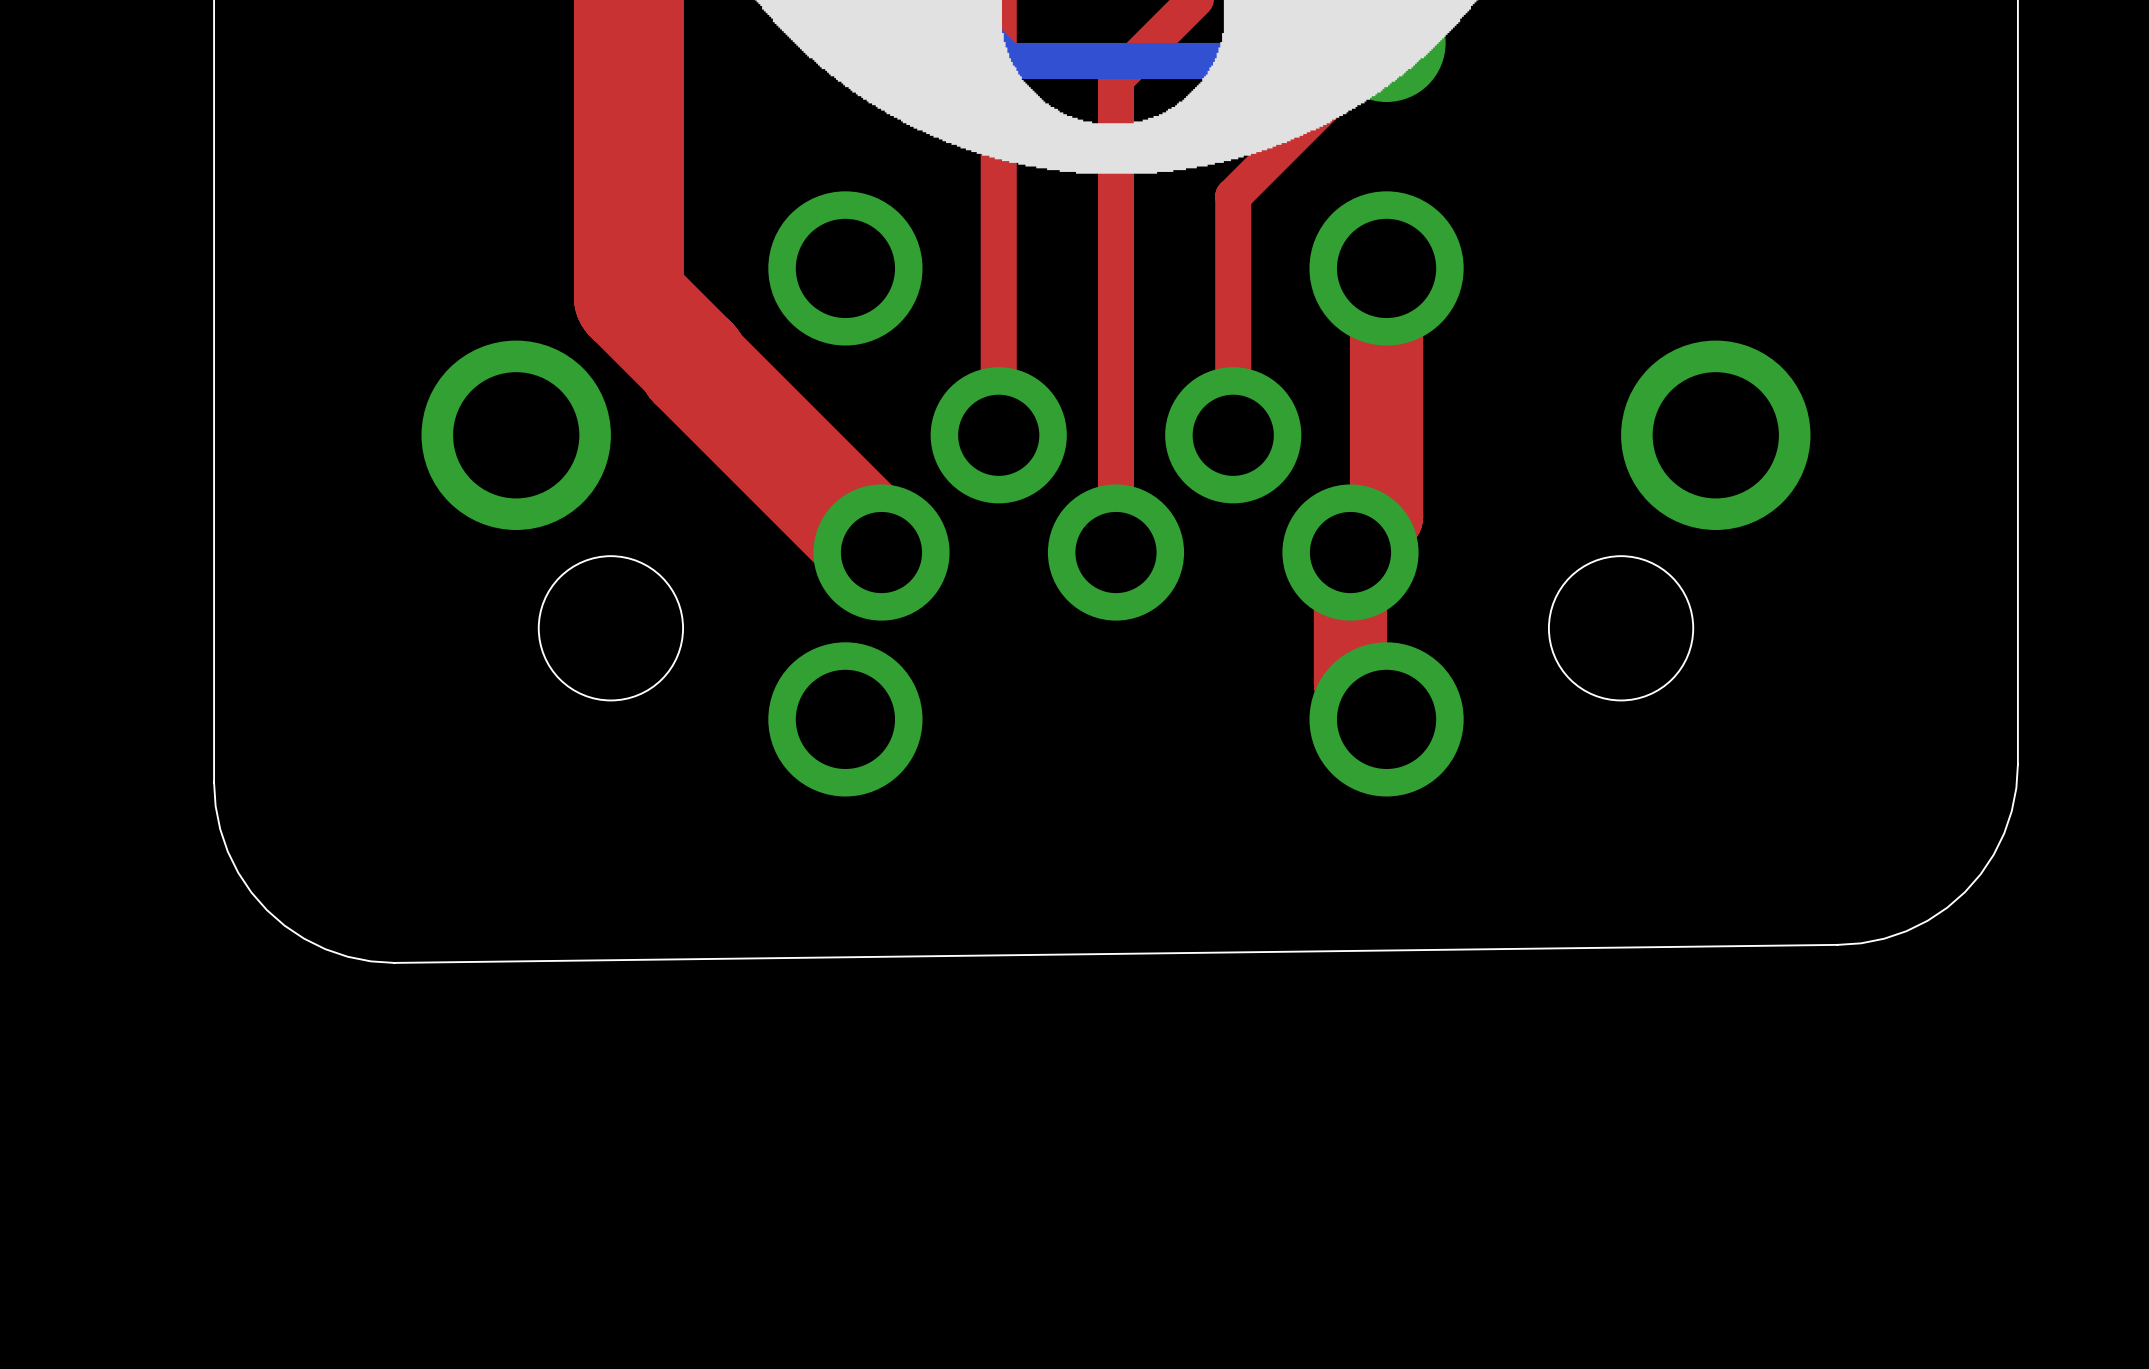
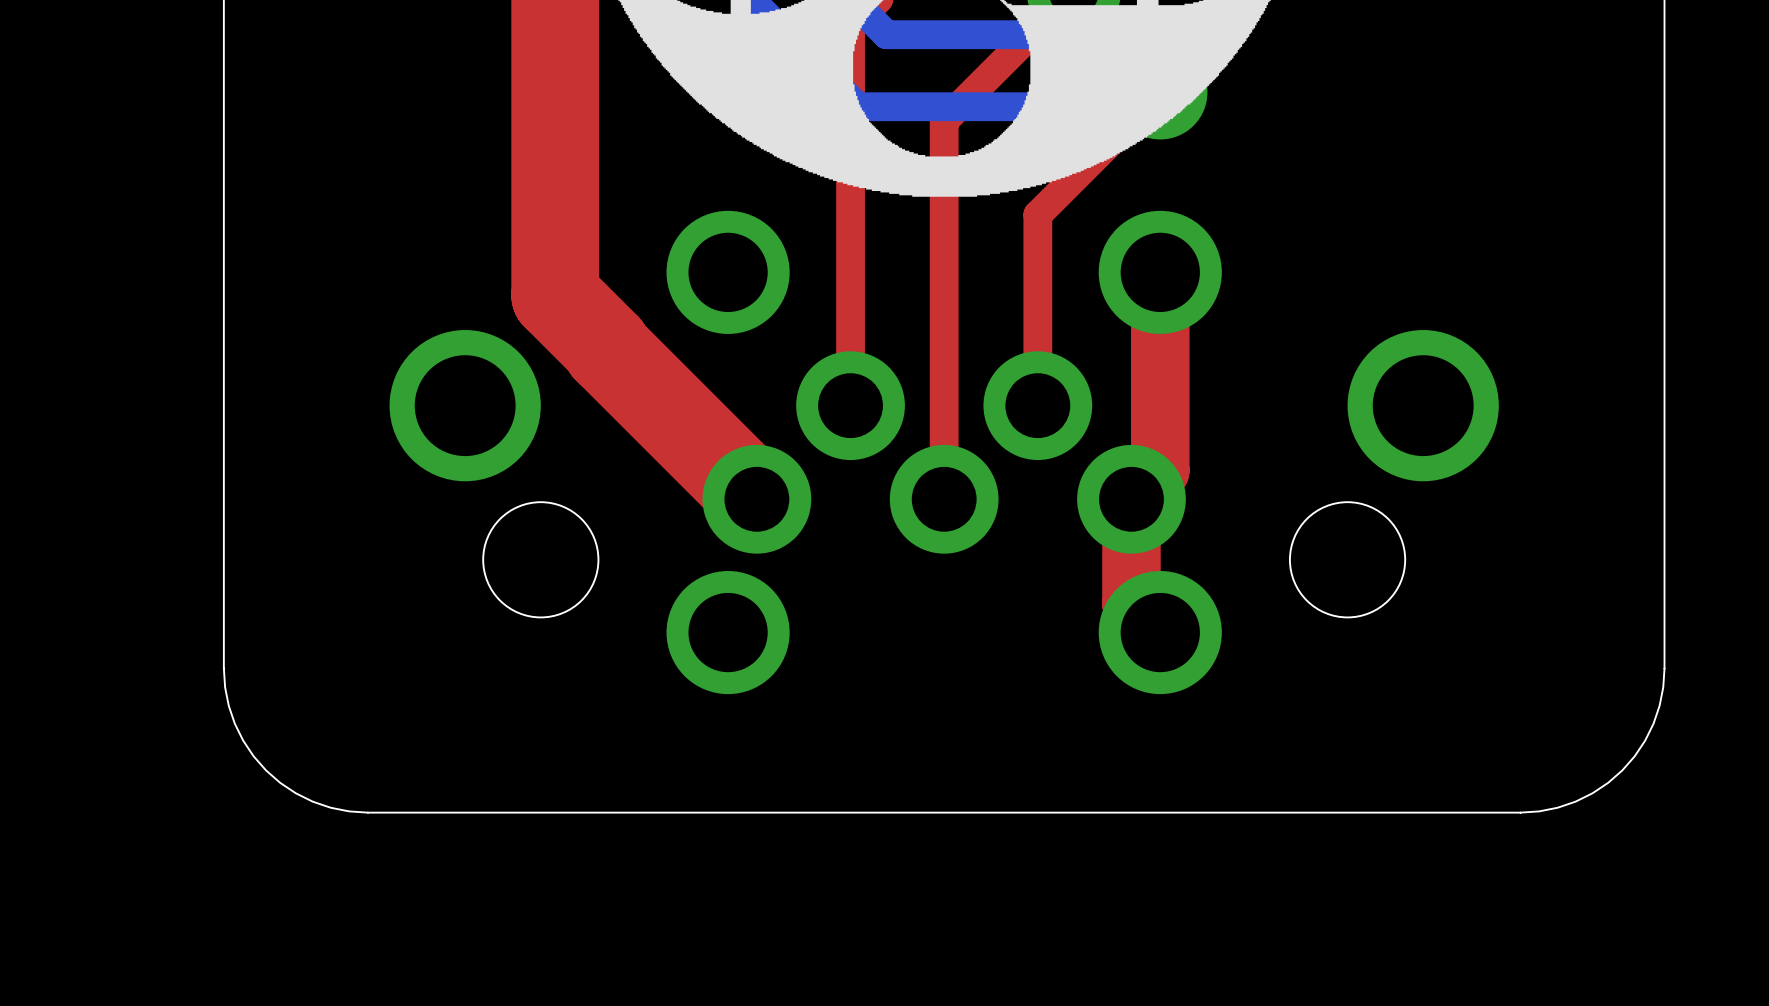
board edge: (214, 764) (215, 806) (220, 829) (227, 851) (238, 872) (251, 892) (266, 910) (284, 925) (304, 938) (325, 949) (347, 956) (370, 961) (394, 962) (1837, 944) -> (223, 668) (228, 705) (234, 723) (253, 756) (280, 782) (295, 793) (312, 801) (349, 811) (1520, 812)

